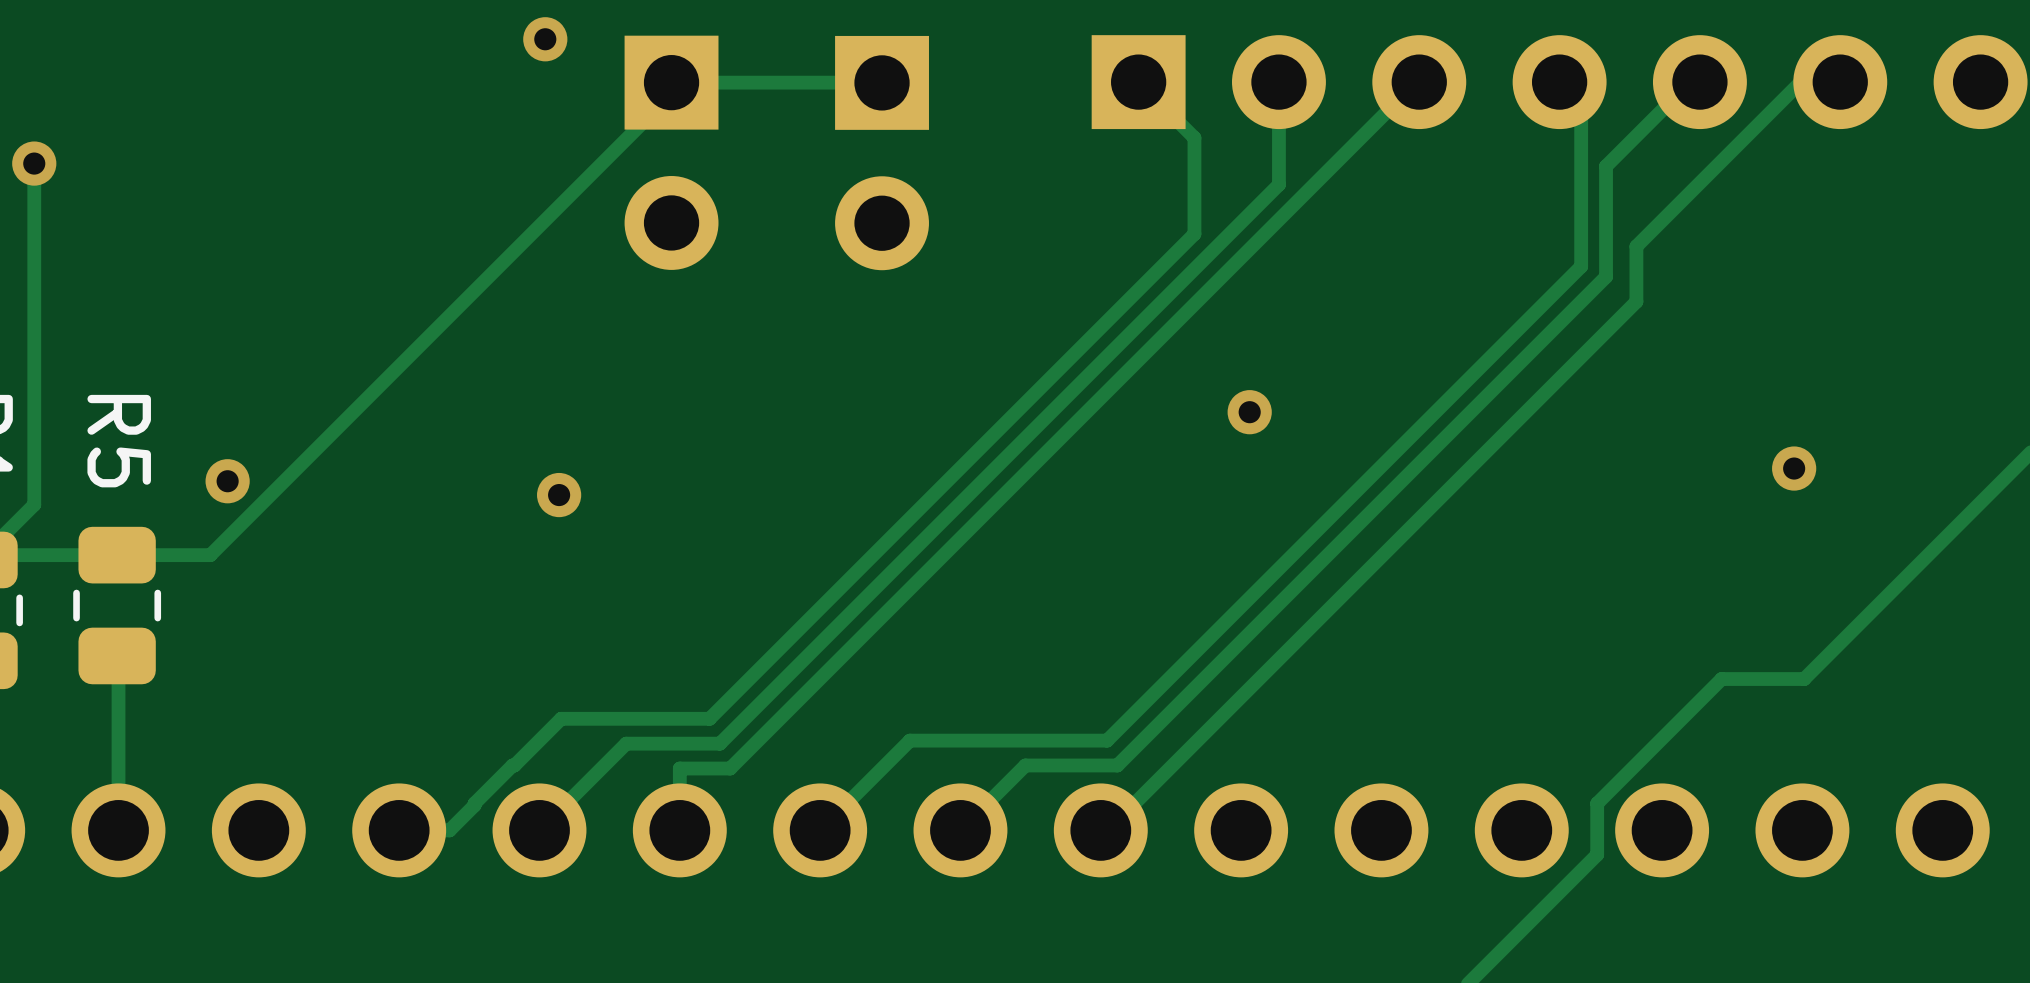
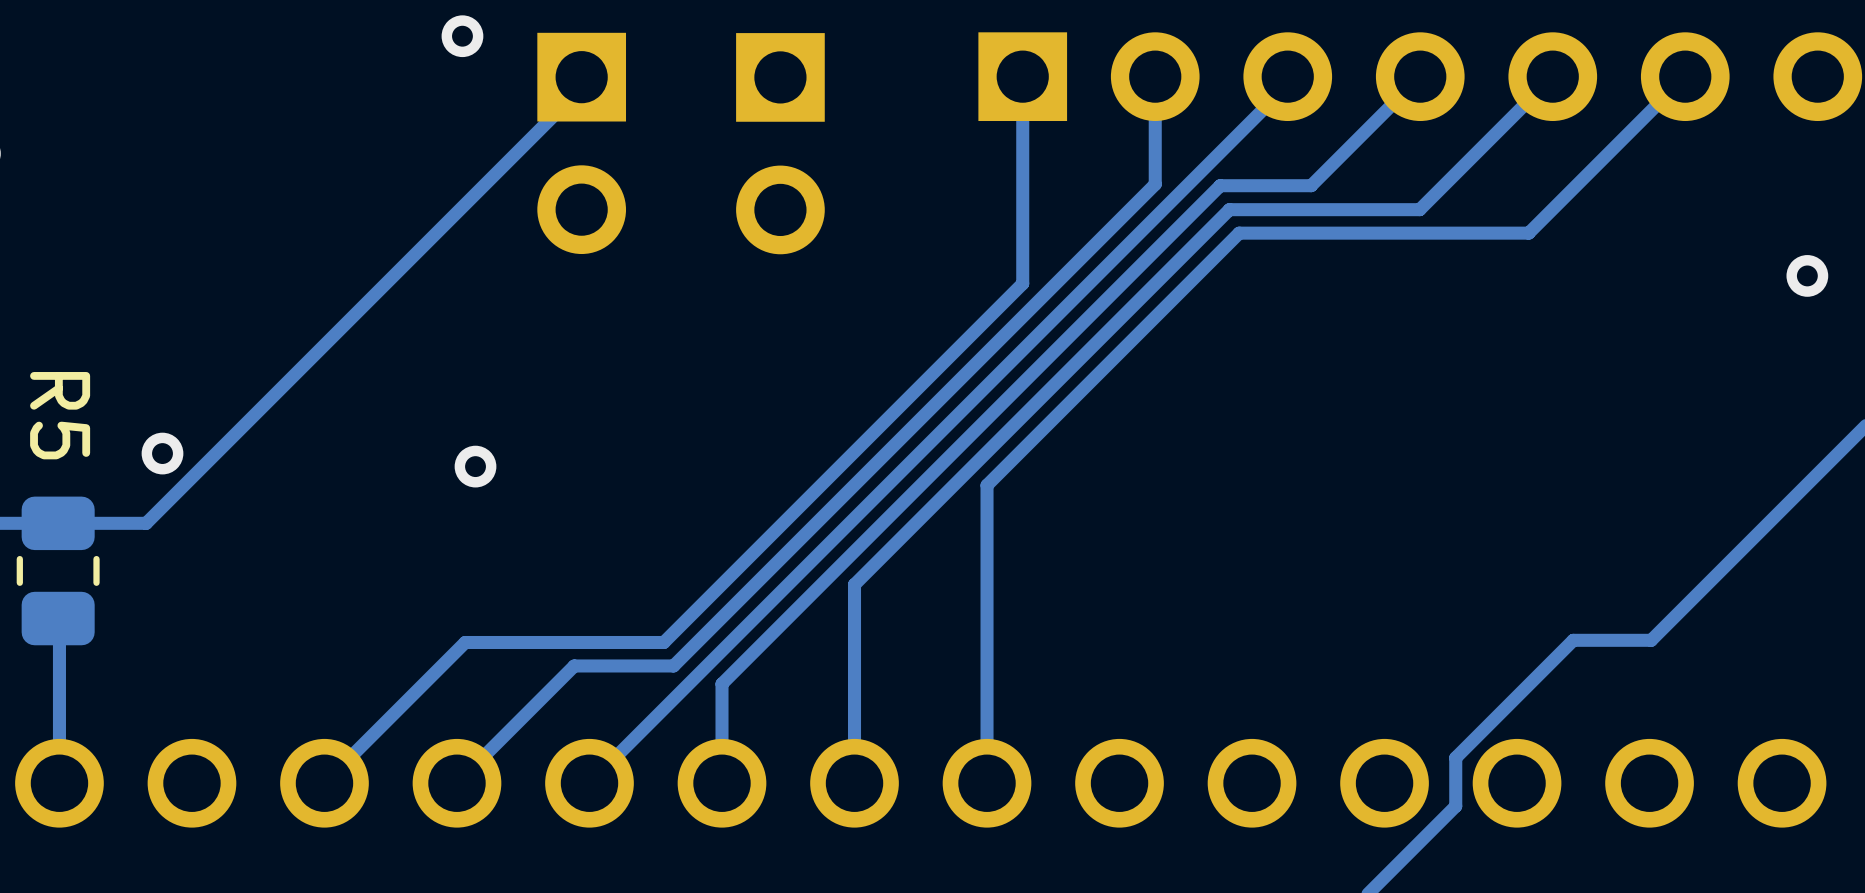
track: (881, 82) (671, 82) -> none
track: (1138, 82) (1194, 137) (1194, 234) (709, 718) (561, 718) (449, 830) (399, 830) -> (1022, 76) (1022, 283) (663, 642) (465, 642) (324, 783)
track: (1419, 82) (1416, 82) (730, 768) (679, 768) (679, 830) -> (1287, 76) (1287, 85) (589, 783)
track: (1559, 82) (1581, 103) (1581, 266) (1107, 740) (909, 740) (820, 830) -> (1420, 76) (1311, 185) (1220, 185) (722, 683) (722, 783)
track: (1699, 82) (1690, 82) (1606, 166) (1606, 276) (1117, 765) (1025, 765) (960, 830) -> (1552, 76) (1419, 209) (1229, 209) (854, 584) (854, 783)
track: (1840, 82) (1800, 82) (1636, 246) (1636, 301) (1107, 830) (1100, 830) -> (1685, 76) (1528, 233) (1239, 233) (987, 485) (987, 783)
track: (1278, 184) (719, 743) (626, 743) -> (1155, 173) (1155, 184) (673, 665) (574, 665) (538, 701)
via: (1249, 412) -> none
via position: (1794, 468) -> (1807, 275)

